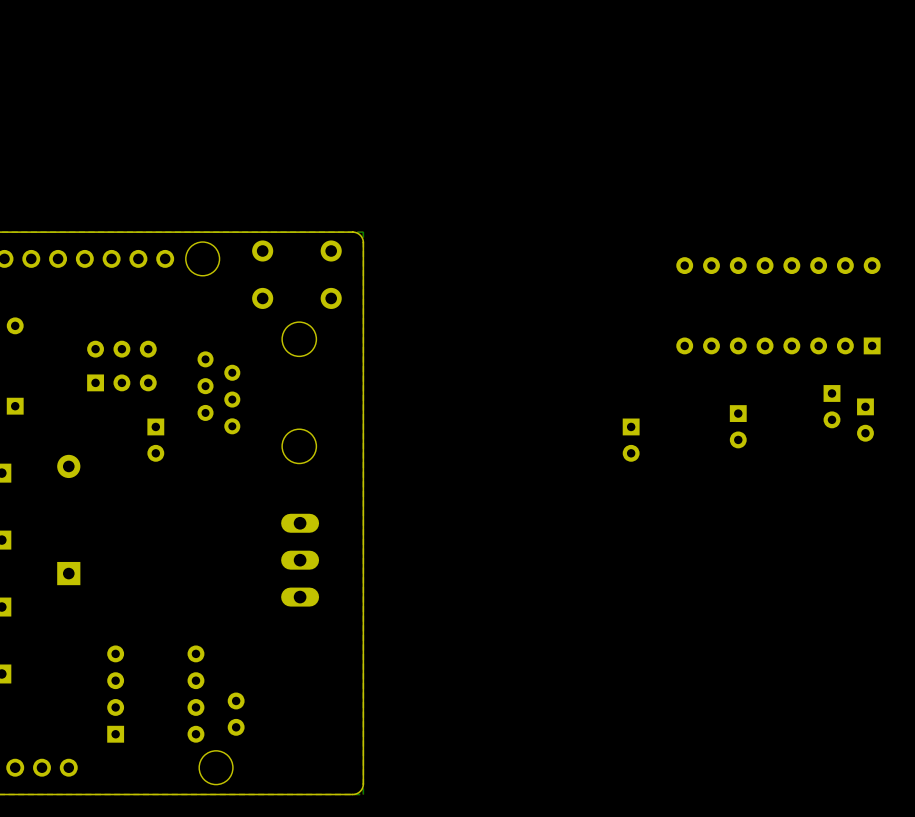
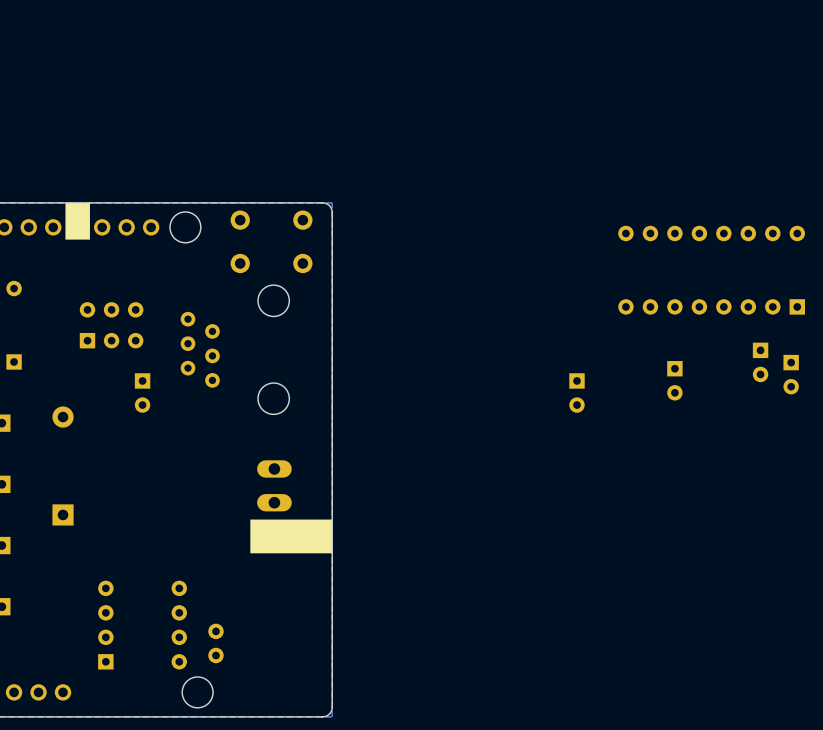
drawing: none -> [65, 202, 90, 240]
drawing: none -> [250, 519, 333, 554]

